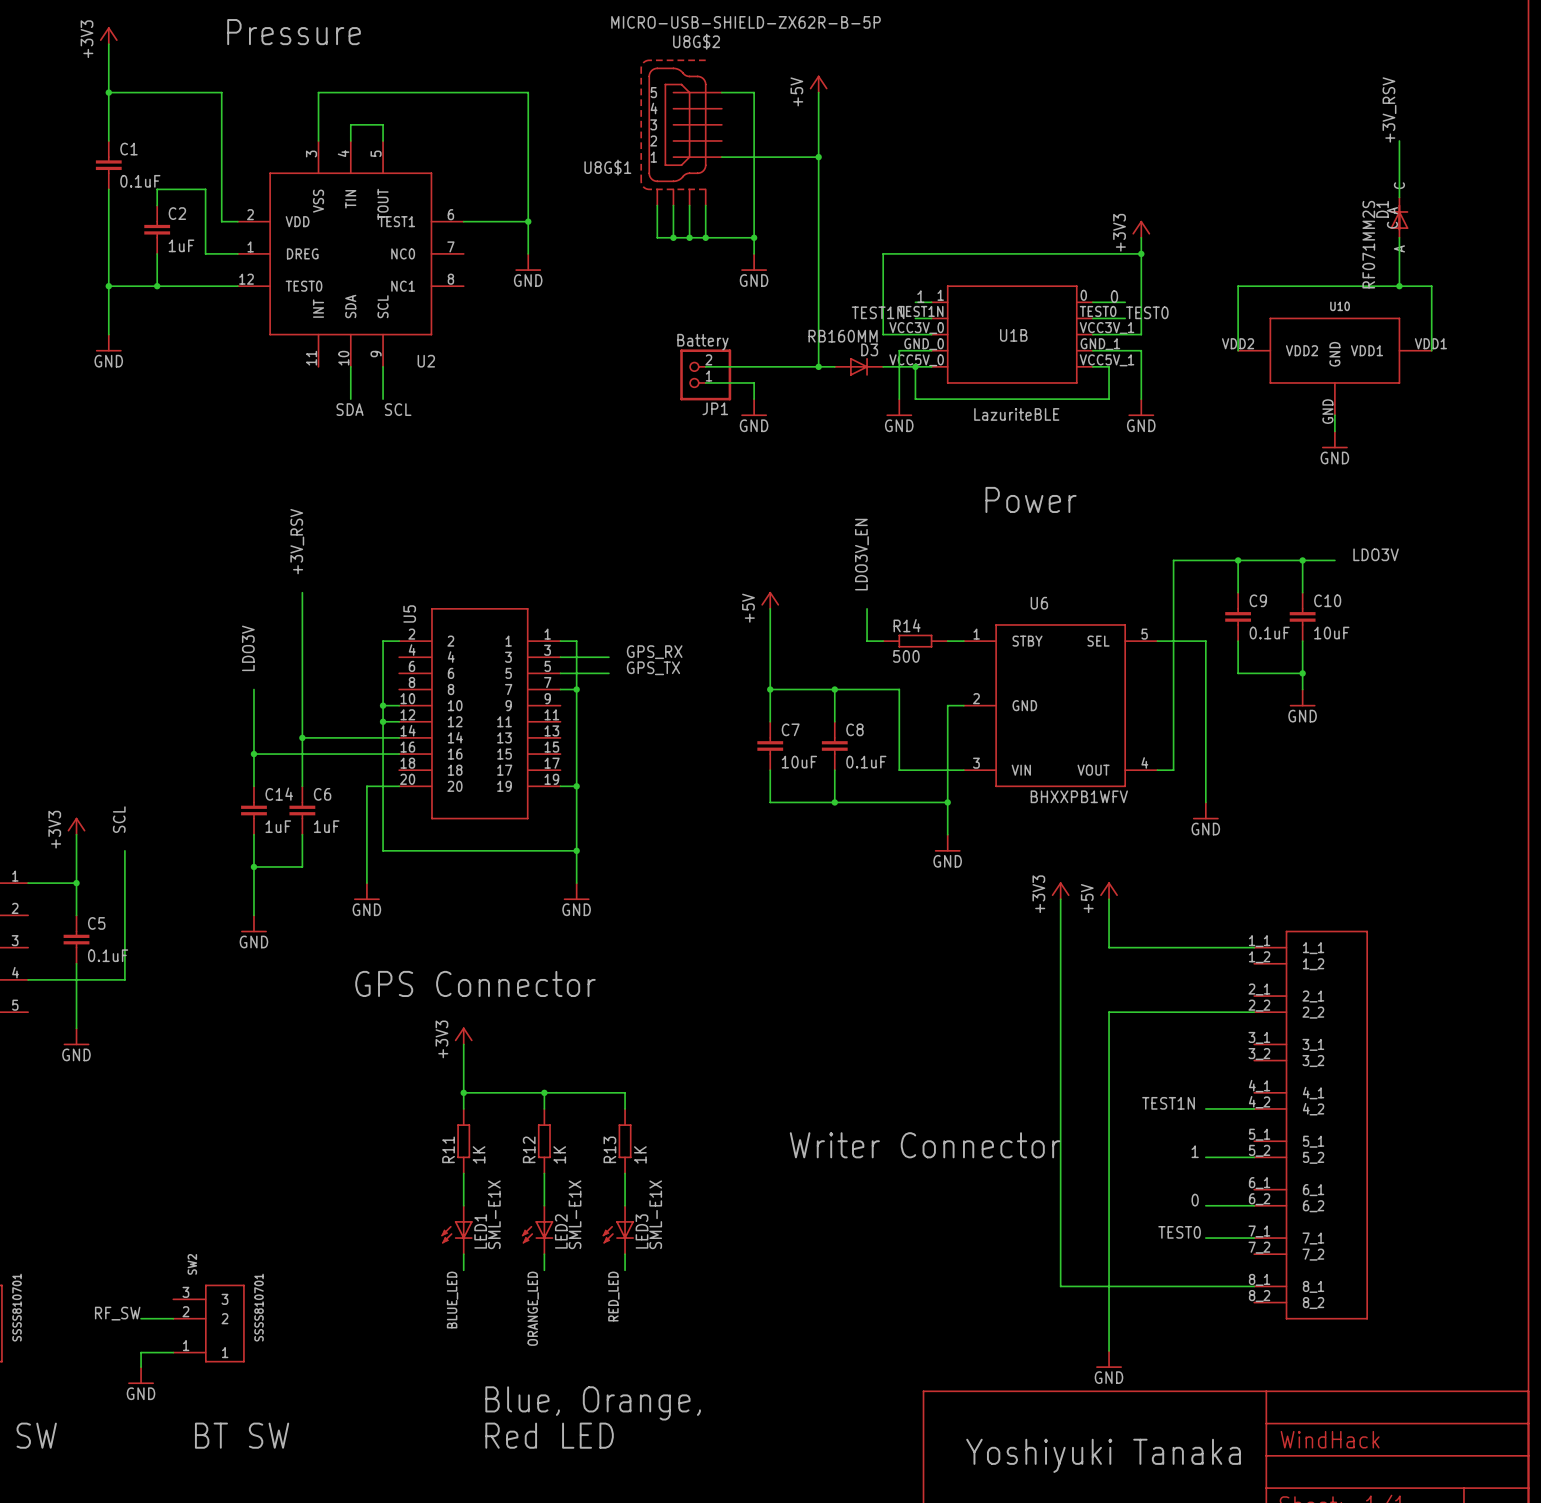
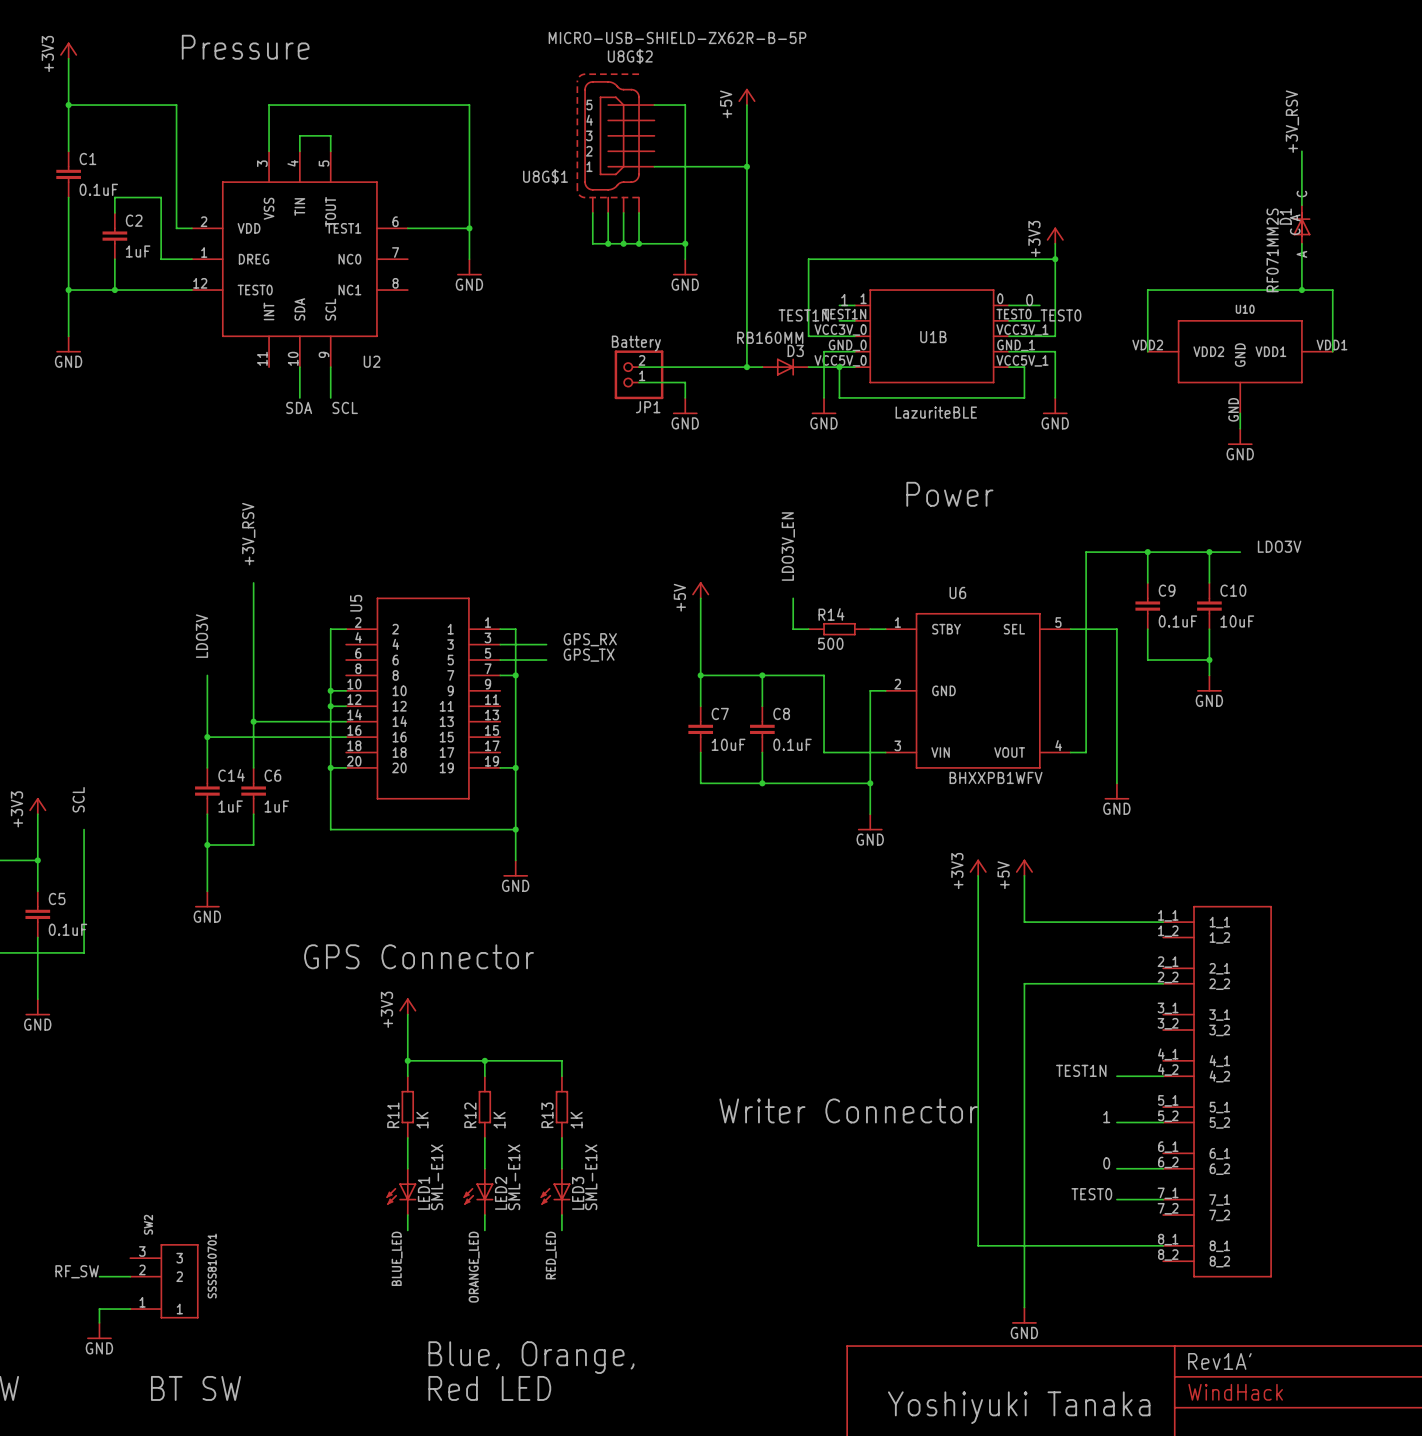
wire: (383, 786) (366, 786) (366, 883) -> none
junction: none -> (330, 767)
power symbol: GND (366, 891) -> none
text: none -> Rev1A' (1219, 1361)

